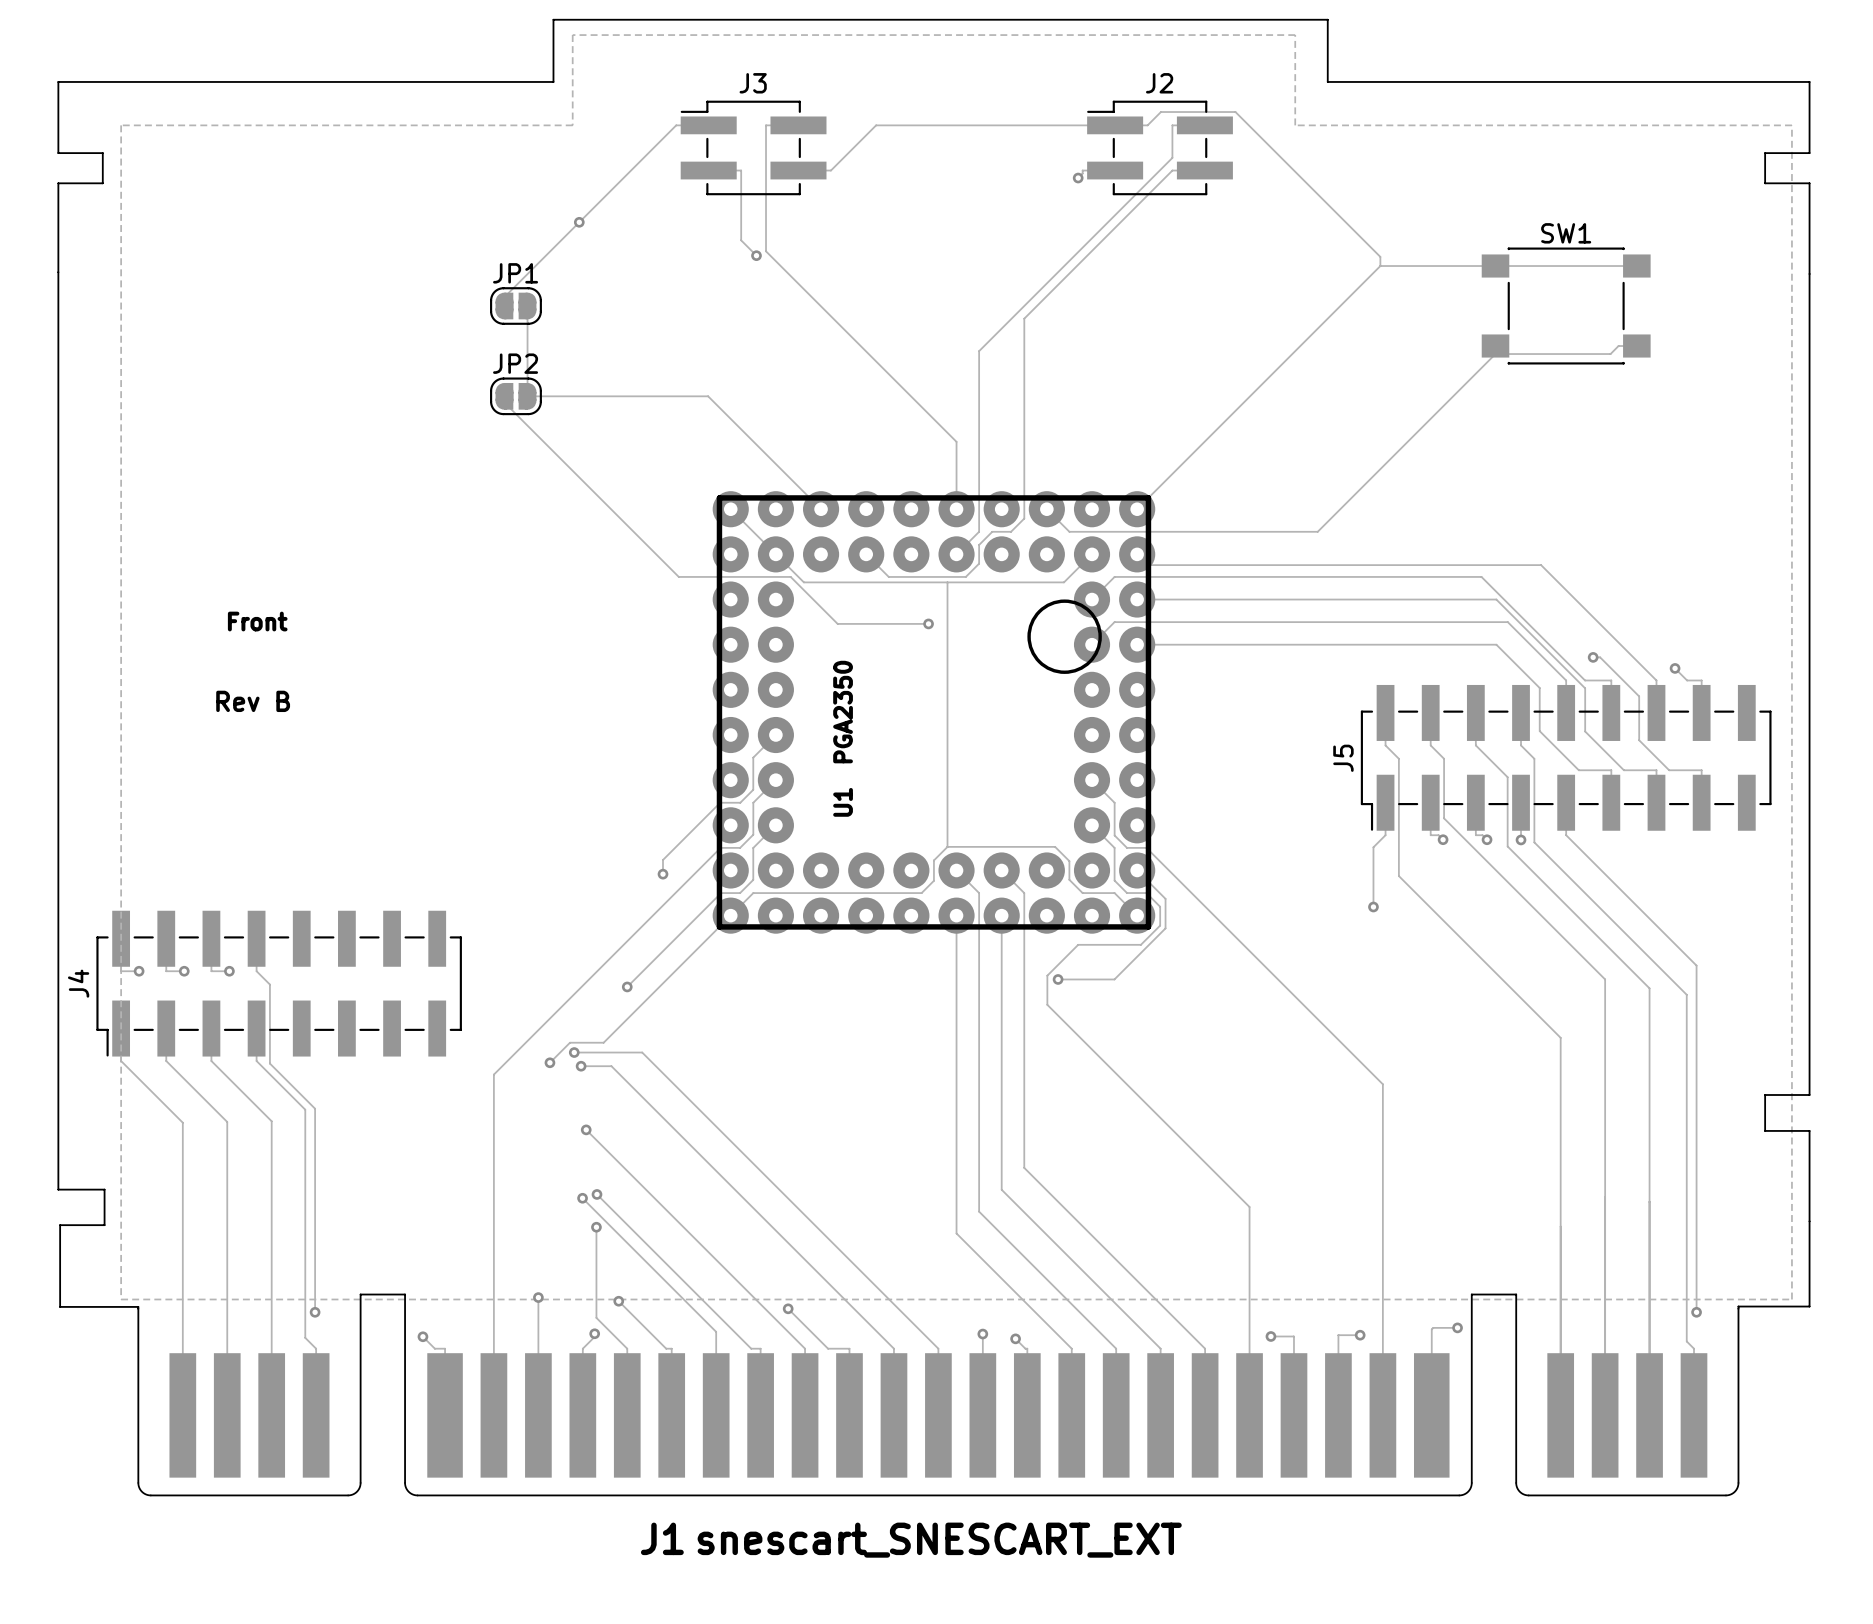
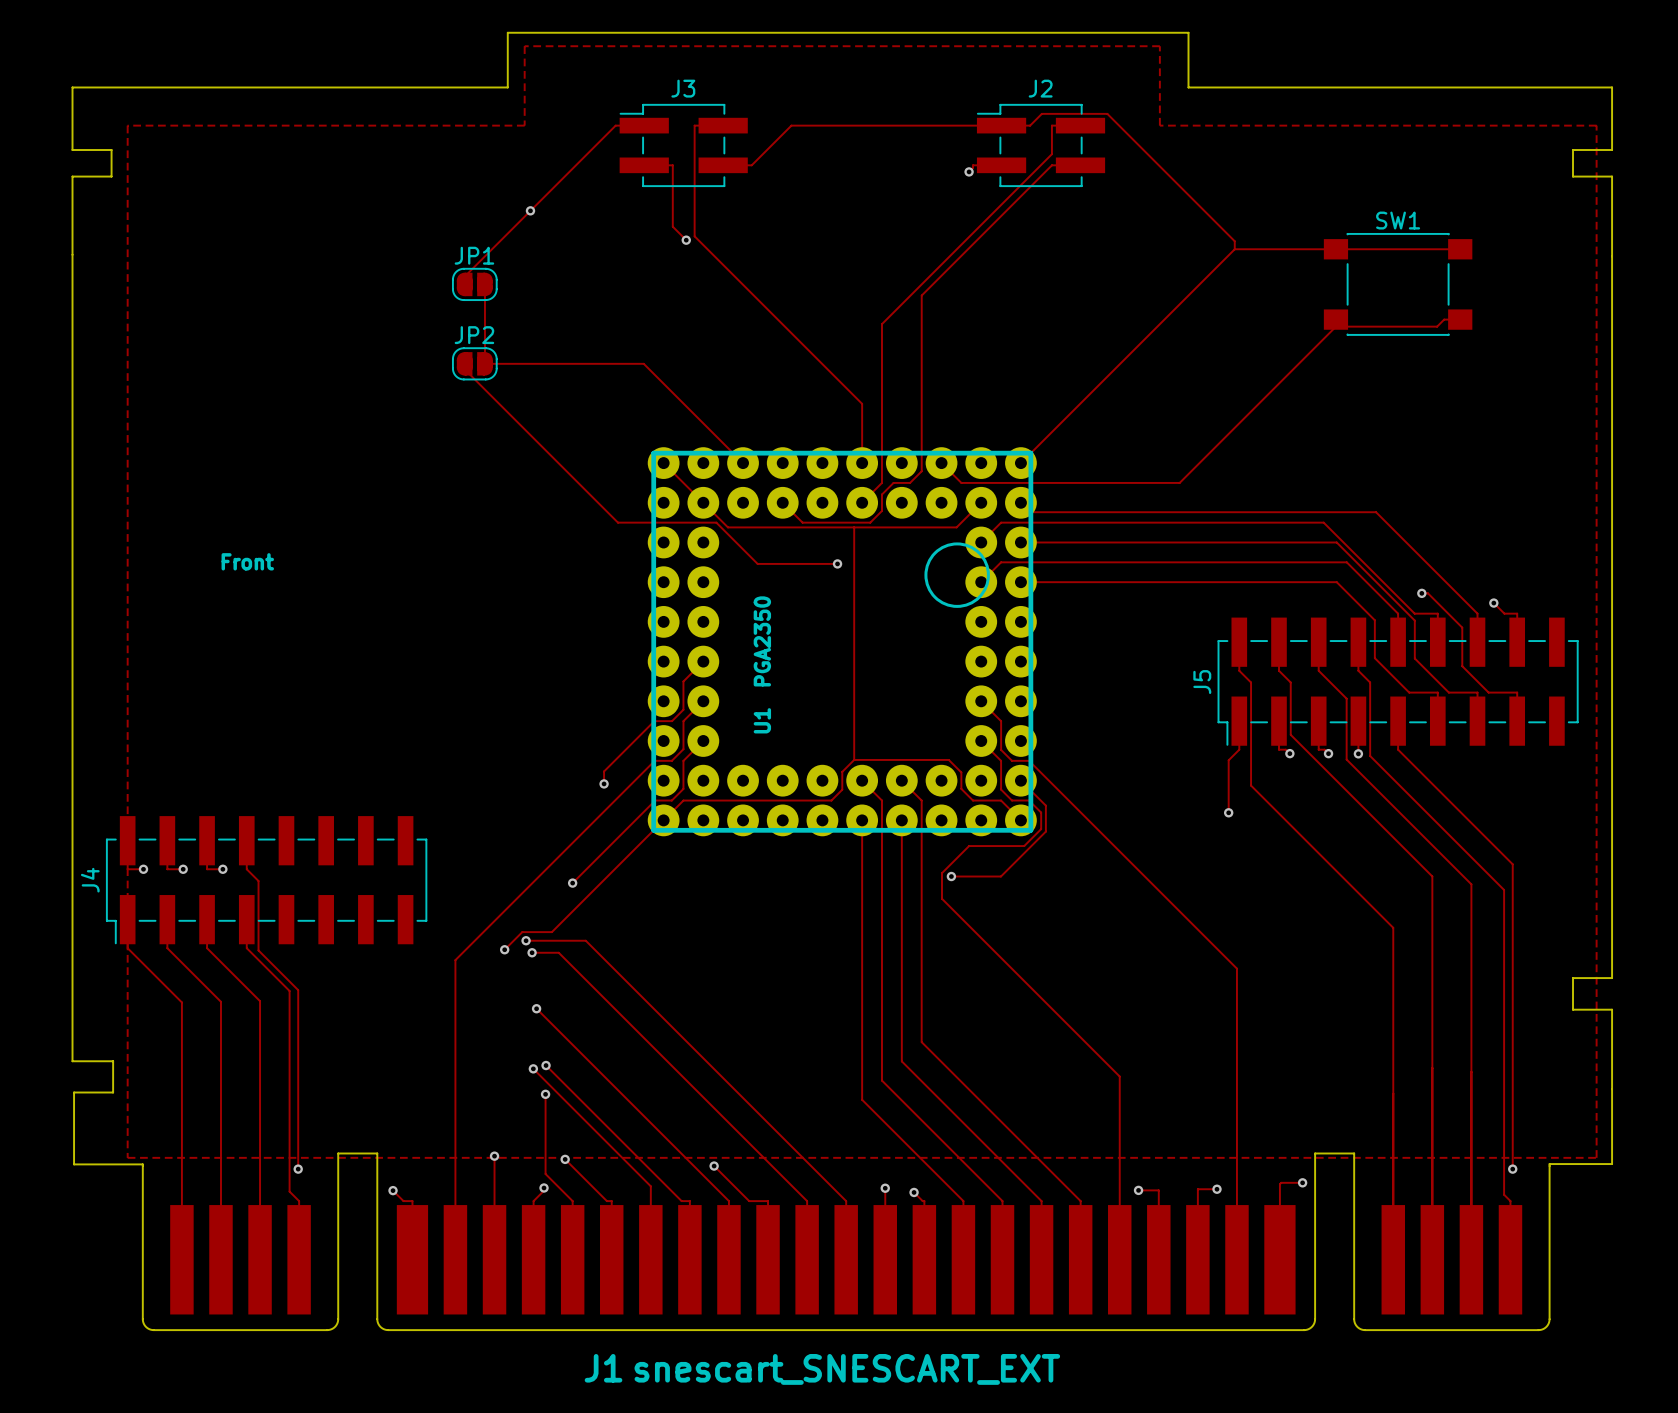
text: Rev B (253, 701) -> none

